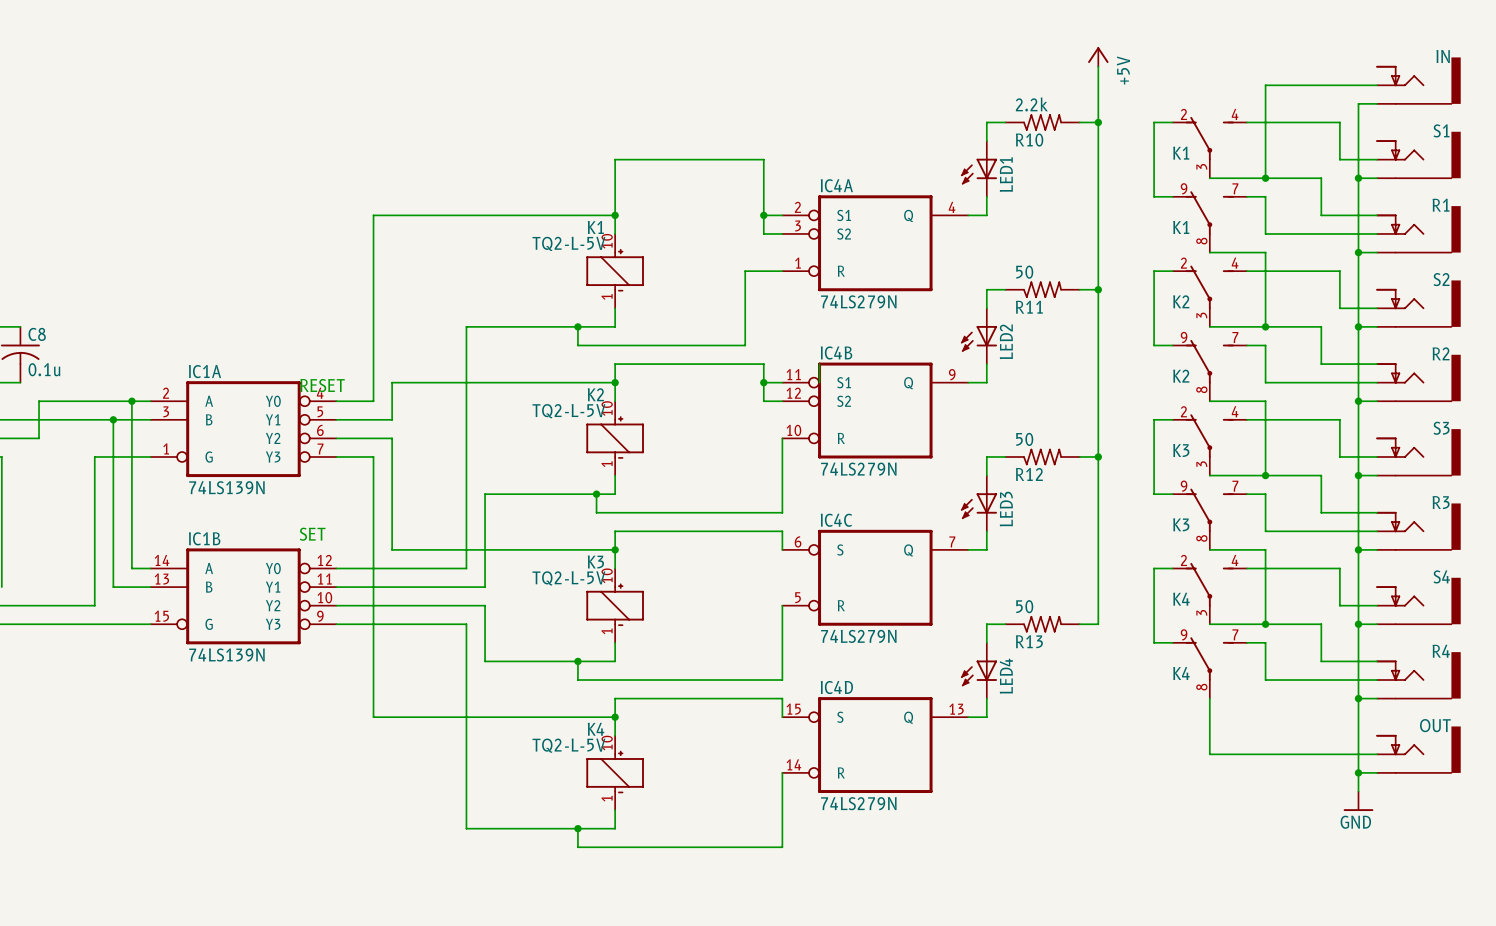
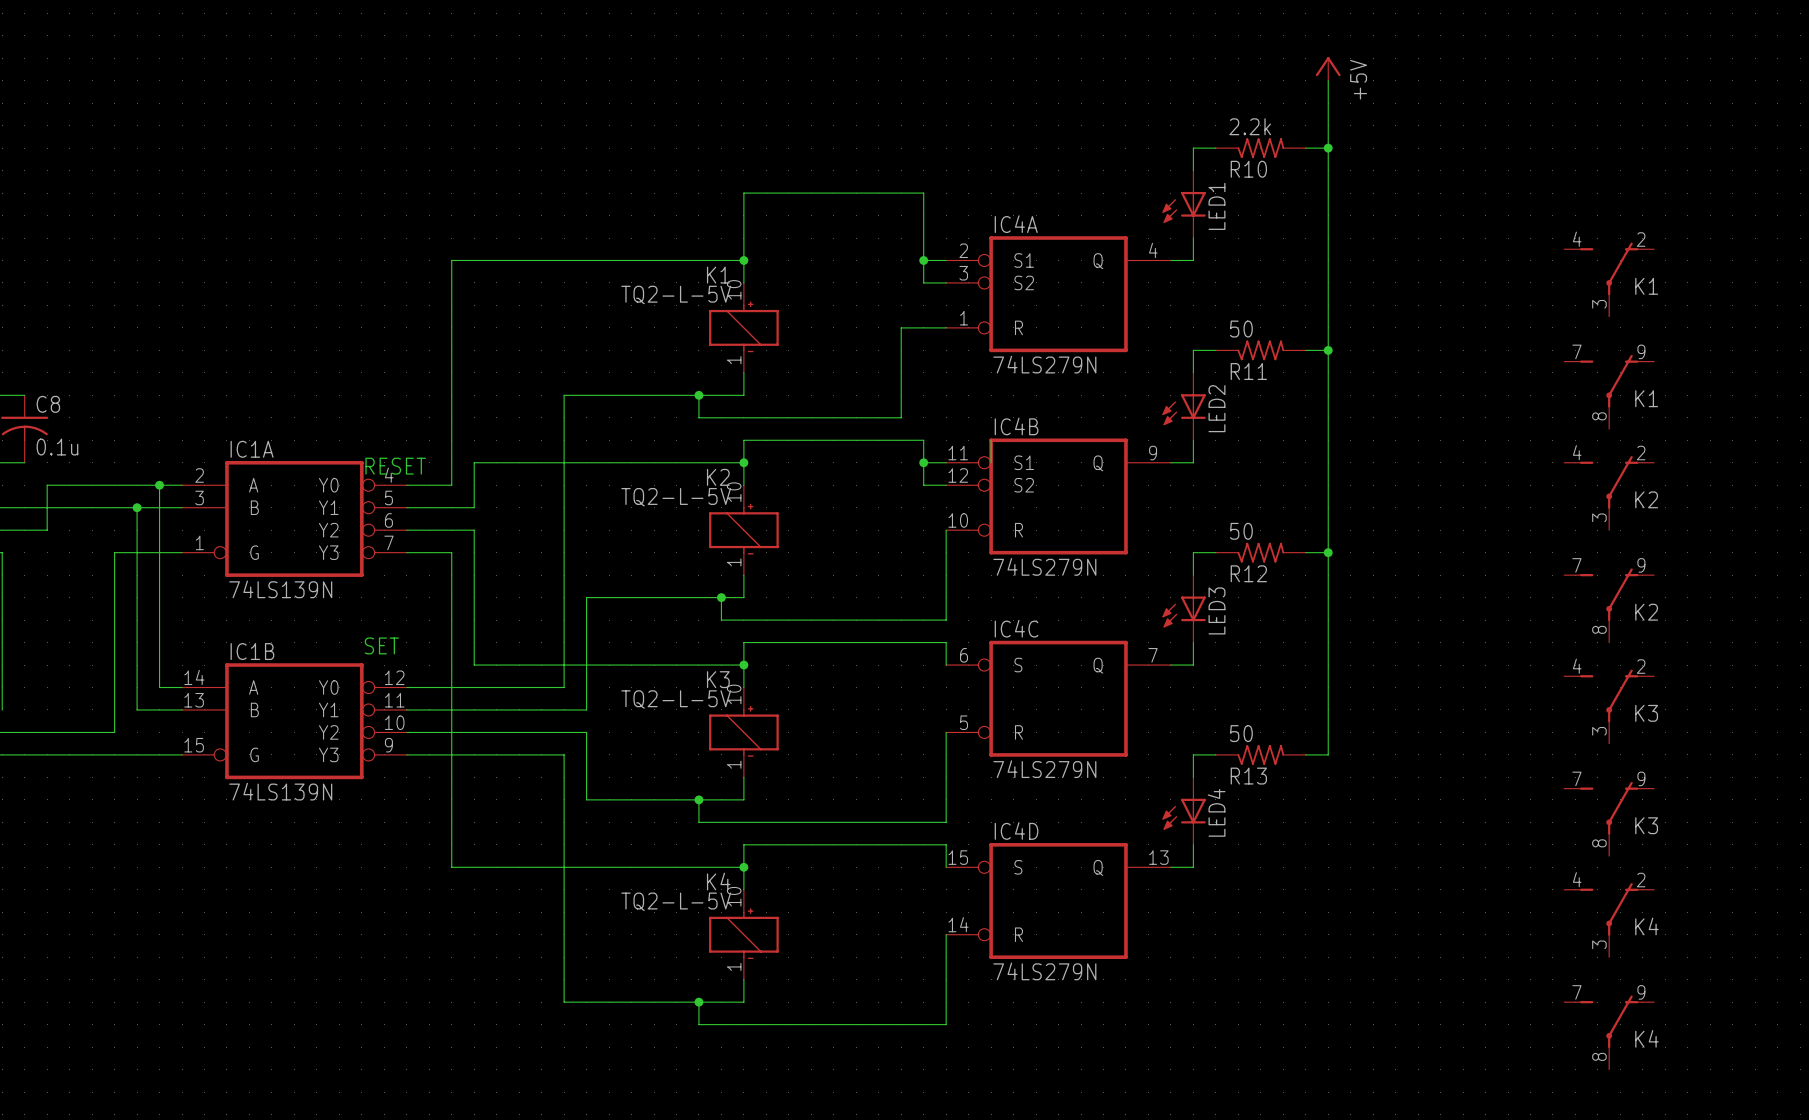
IN: (1418, 80) -> none
wire: (1377, 85) (1265, 85) (1265, 178) -> none
wire: (1377, 103) (1358, 103) (1358, 791) -> none
wire: (1172, 122) (1154, 122) (1154, 196) (1172, 196) -> none
wire: (1246, 122) (1339, 122) (1339, 159) (1377, 159) -> none
K1: (1209, 147) -> none
S1: (1418, 155) -> none
wire: (1209, 178) (1321, 178) (1321, 215) (1377, 215) -> none
junction: (1265, 178) -> none
wire: (1358, 178) (1377, 178) -> none
junction: (1358, 178) -> none
wire: (1246, 196) (1265, 196) (1265, 233) (1377, 233) -> none
K1: (1209, 221) -> none
R1: (1418, 229) -> none
K1: none -> (1609, 279)
wire: (1209, 252) (1265, 252) (1265, 326) -> none
wire: (1358, 252) (1377, 252) -> none
junction: (1358, 252) -> none
wire: (1172, 271) (1154, 271) (1154, 345) (1172, 345) -> none
wire: (1246, 271) (1339, 271) (1339, 308) (1377, 308) -> none
K2: (1209, 296) -> none
S2: (1418, 303) -> none
K1: none -> (1609, 391)
wire: (1209, 326) (1321, 326) (1321, 364) (1377, 364) -> none
junction: (1265, 326) -> none
wire: (1358, 326) (1377, 326) -> none
junction: (1358, 326) -> none
wire: (1246, 345) (1265, 345) (1265, 382) (1377, 382) -> none
K2: (1209, 370) -> none
R2: (1418, 378) -> none
wire: (1209, 401) (1265, 401) (1265, 475) -> none
wire: (1358, 401) (1377, 401) -> none
junction: (1358, 401) -> none
K2: none -> (1609, 493)
wire: (1172, 419) (1154, 419) (1154, 494) (1172, 494) -> none
wire: (1246, 419) (1339, 419) (1339, 456) (1377, 456) -> none
K3: (1209, 444) -> none
S3: (1418, 452) -> none
wire: (1209, 475) (1321, 475) (1321, 512) (1377, 512) -> none
junction: (1265, 475) -> none
wire: (1358, 475) (1377, 475) -> none
junction: (1358, 475) -> none
wire: (1246, 494) (1265, 494) (1265, 531) (1377, 531) -> none
K2: none -> (1609, 605)
K3: (1209, 519) -> none
R3: (1418, 526) -> none
wire: (1209, 549) (1265, 549) (1265, 624) -> none
wire: (1358, 549) (1377, 549) -> none
junction: (1358, 549) -> none
wire: (1172, 568) (1154, 568) (1154, 642) (1172, 642) -> none
wire: (1246, 568) (1339, 568) (1339, 605) (1377, 605) -> none
K3: none -> (1609, 706)
K4: (1209, 593) -> none
S4: (1418, 601) -> none
wire: (1209, 624) (1321, 624) (1321, 661) (1377, 661) -> none
junction: (1265, 624) -> none
wire: (1358, 624) (1377, 624) -> none
junction: (1358, 624) -> none
wire: (1246, 642) (1265, 642) (1265, 680) (1377, 680) -> none
K4: (1209, 667) -> none
R4: (1418, 675) -> none
K3: none -> (1609, 818)
wire: (1209, 698) (1209, 754) (1377, 754) -> none
wire: (1358, 698) (1377, 698) -> none
junction: (1358, 698) -> none
OUT: (1418, 749) -> none
K4: none -> (1609, 920)
wire: (1358, 772) (1377, 772) -> none
junction: (1358, 772) -> none
power symbol: GND (1358, 801) -> none
K4: none -> (1609, 1032)

